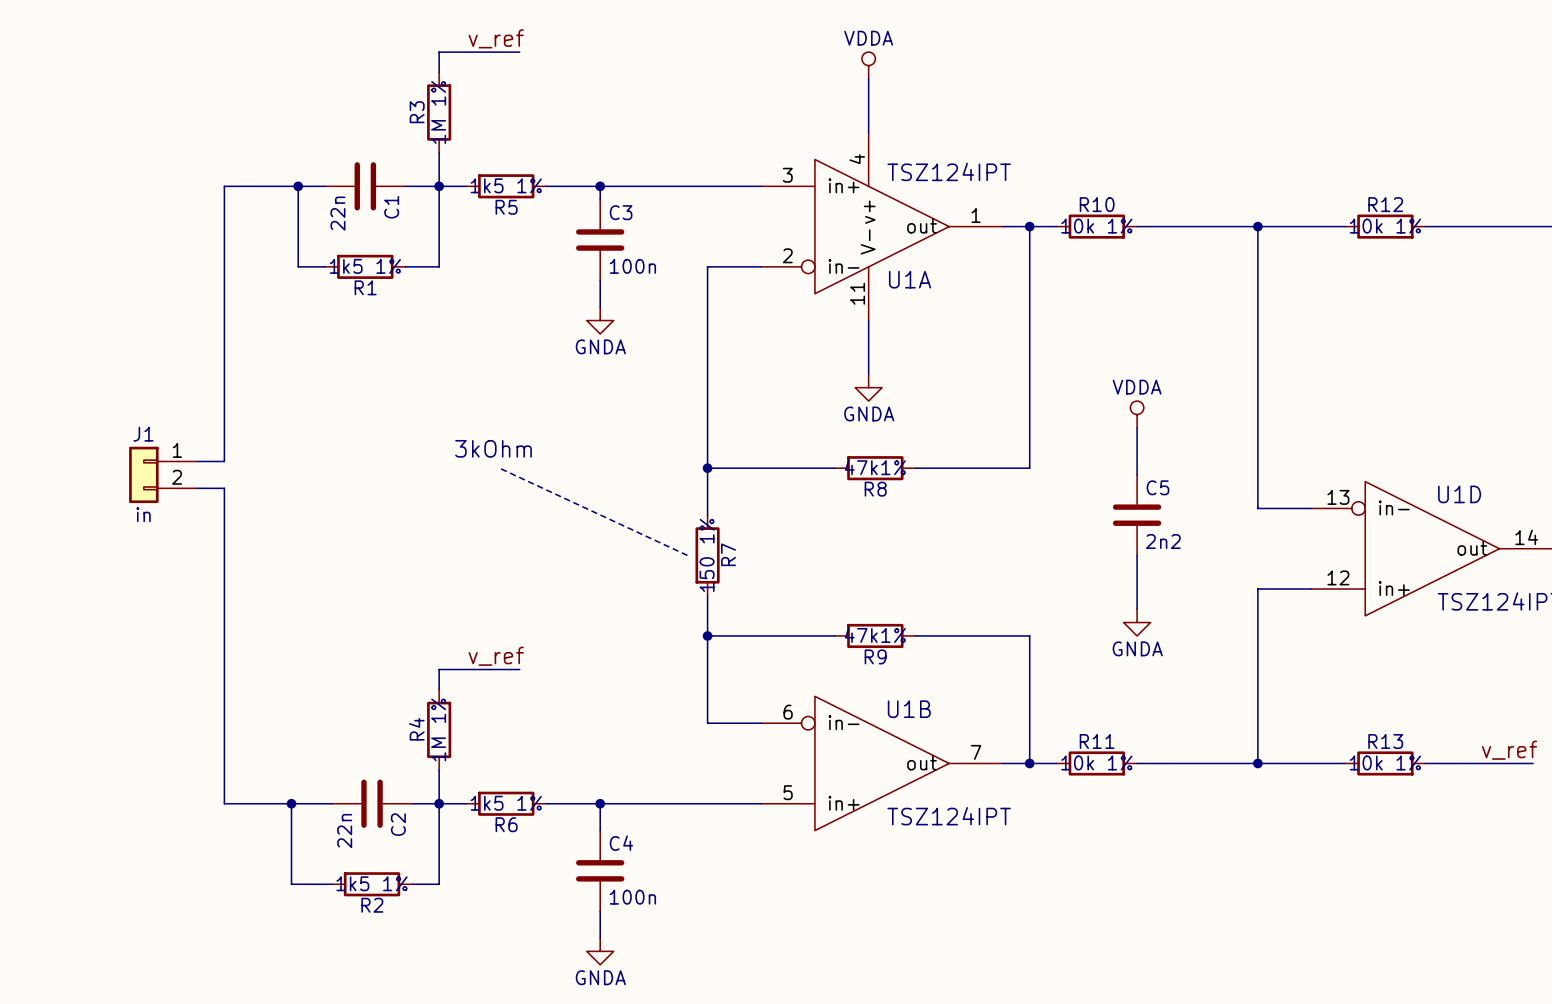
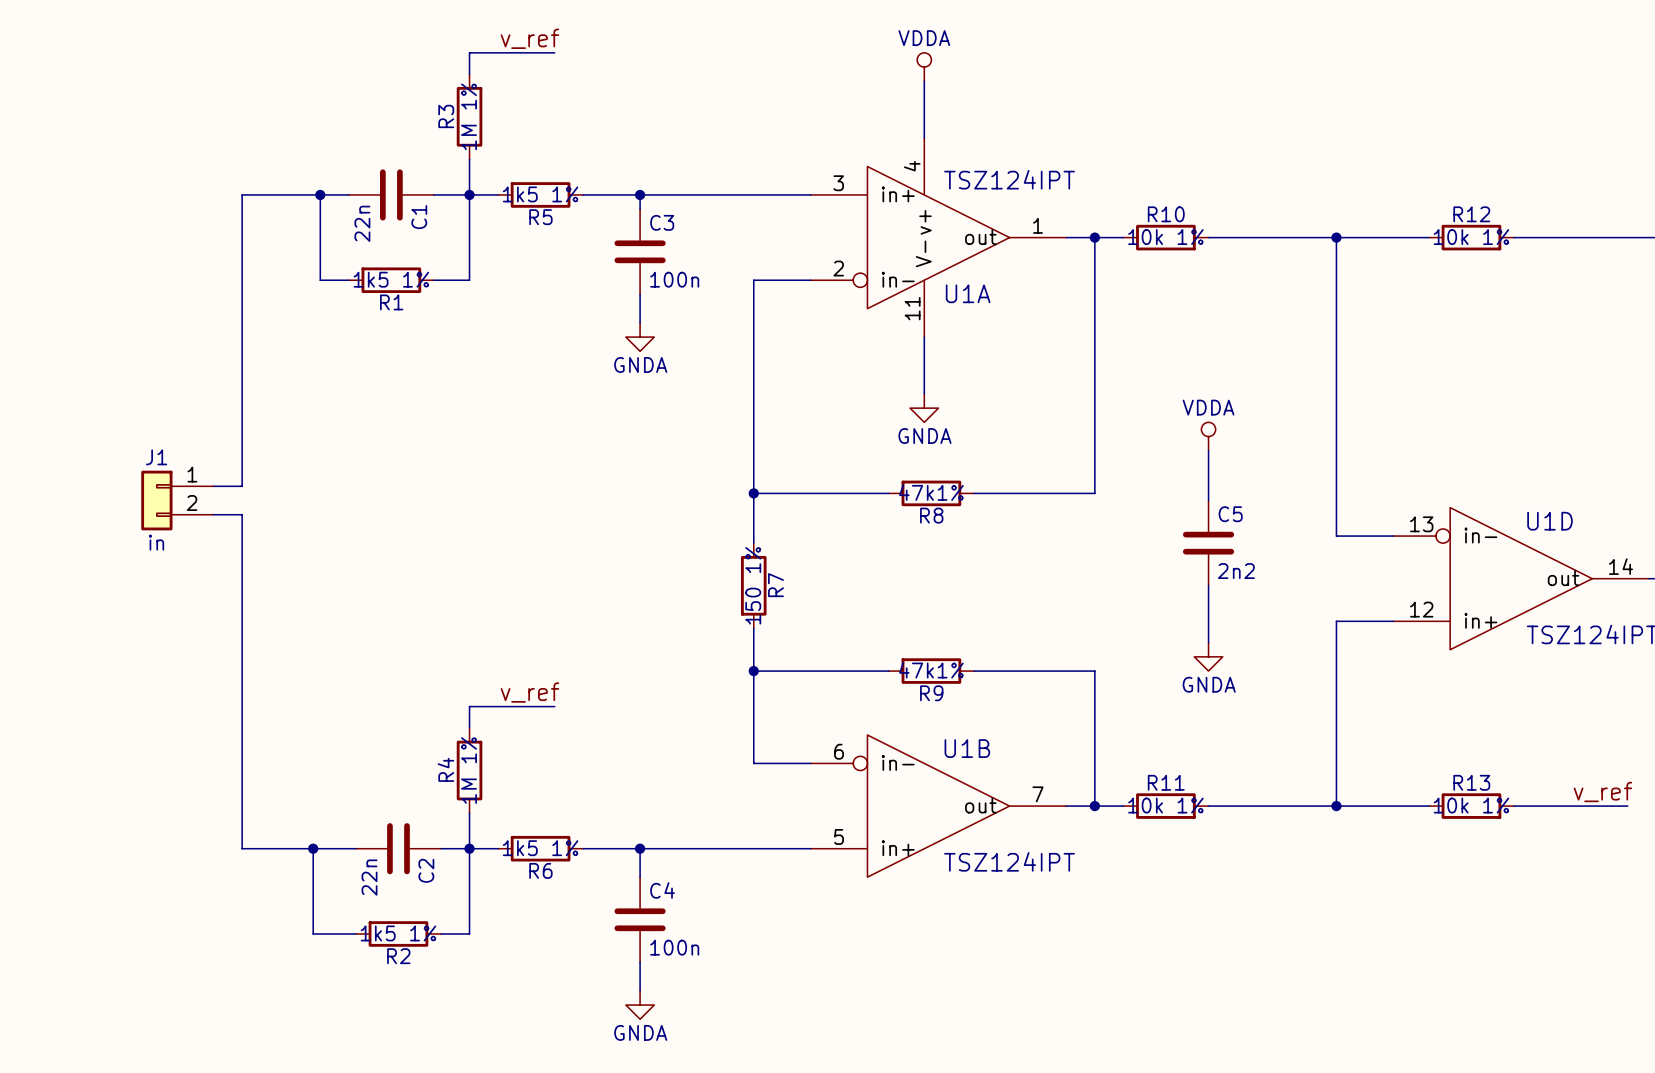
text: 3kOhm (493, 448) -> none
line: (499, 468) (687, 555) -> none

